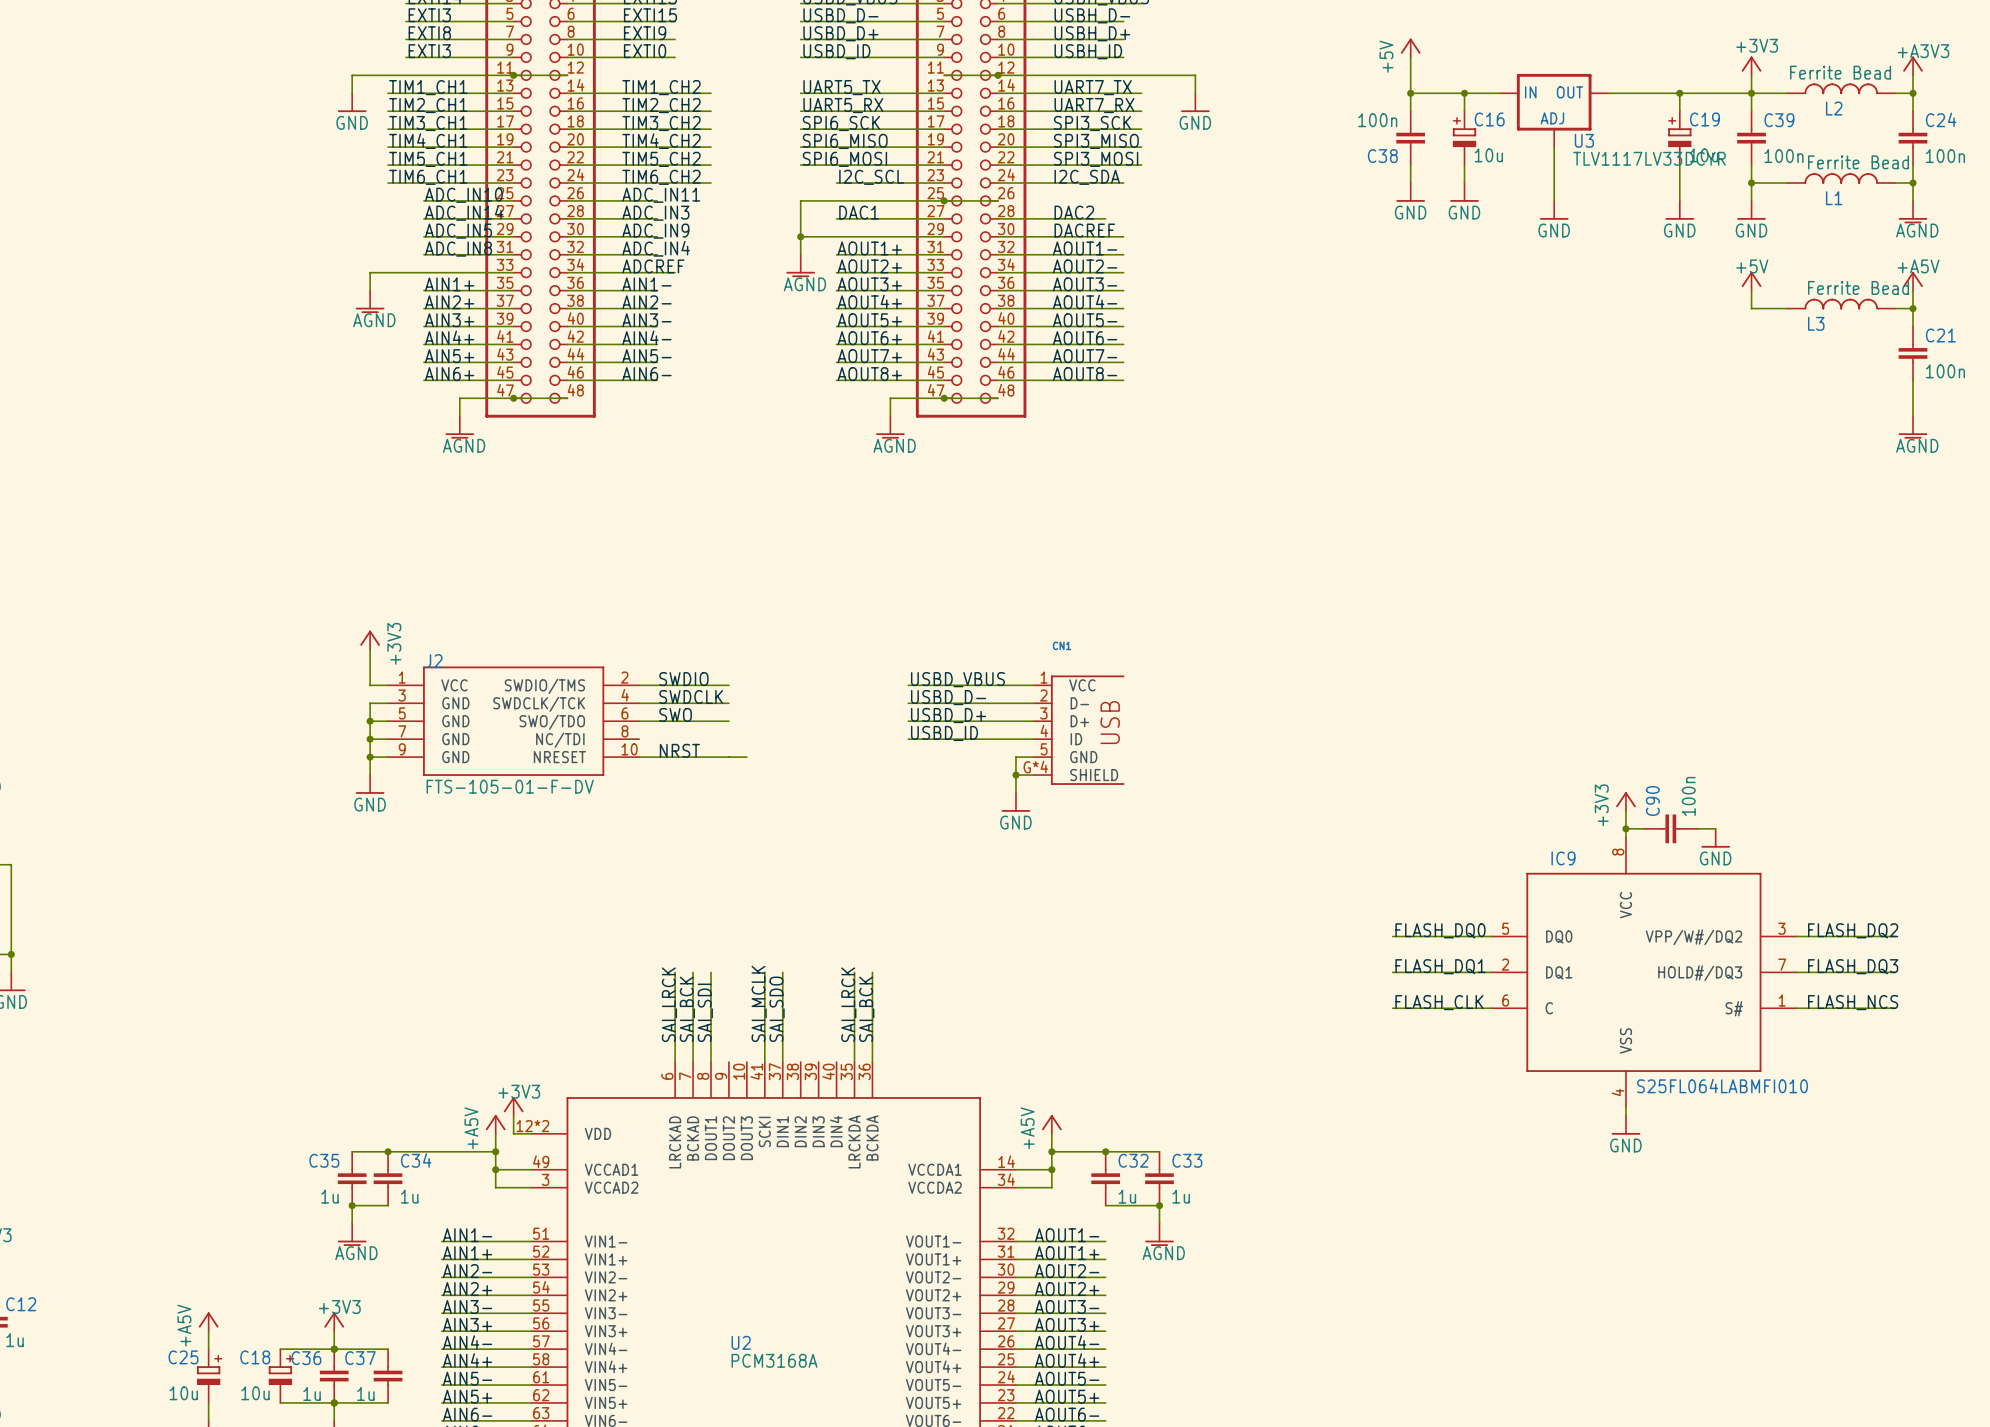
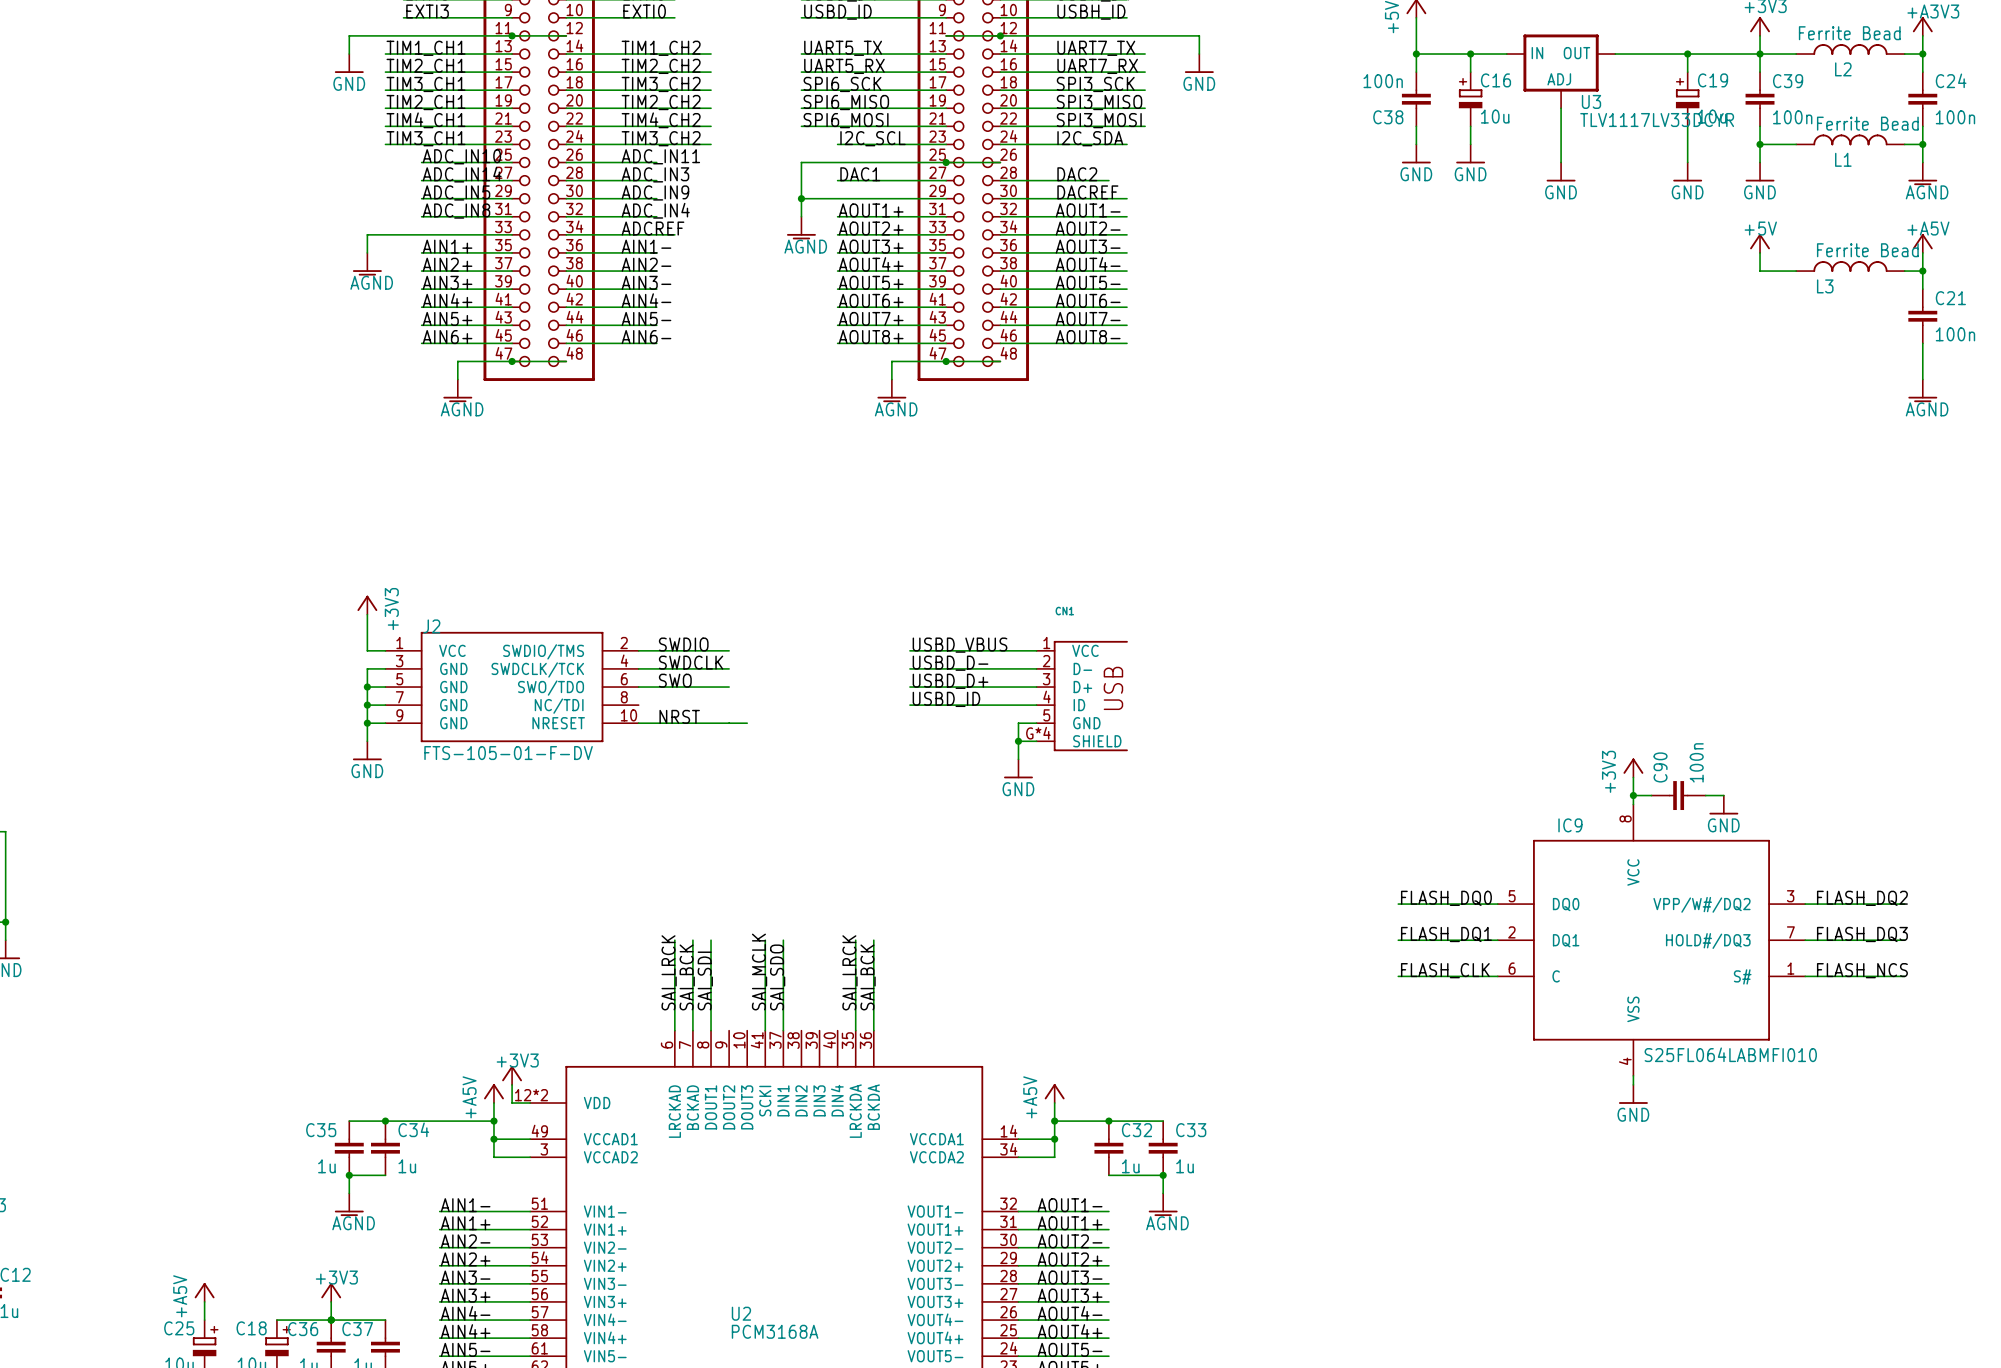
label: TIM4_CH1 (428, 141) -> TIM2_CH1 (426, 102)
label: TIM4_CH2 (661, 141) -> TIM2_CH2 (661, 102)
label: TIM5_CH1 (428, 159) -> TIM4_CH1 (426, 120)
label: TIM5_CH2 (661, 159) -> TIM4_CH2 (661, 120)
label: TIM6_CH1 (428, 177) -> TIM3_CH1 (426, 138)
label: TIM6_CH2 (661, 177) -> TIM3_CH2 (661, 138)

